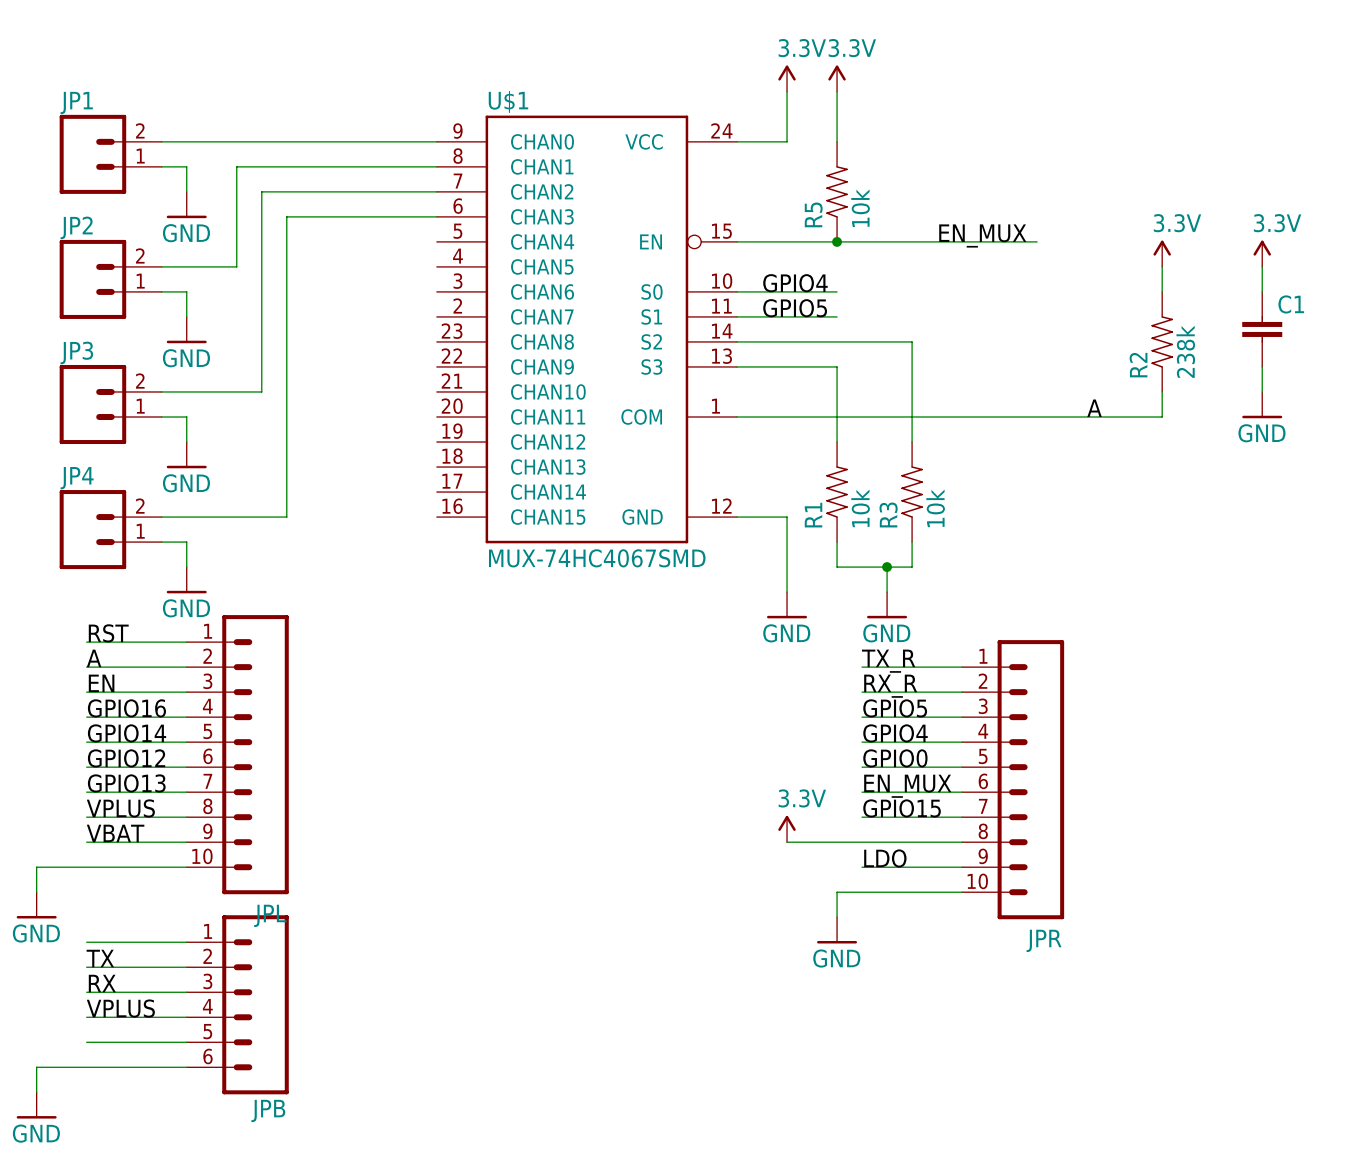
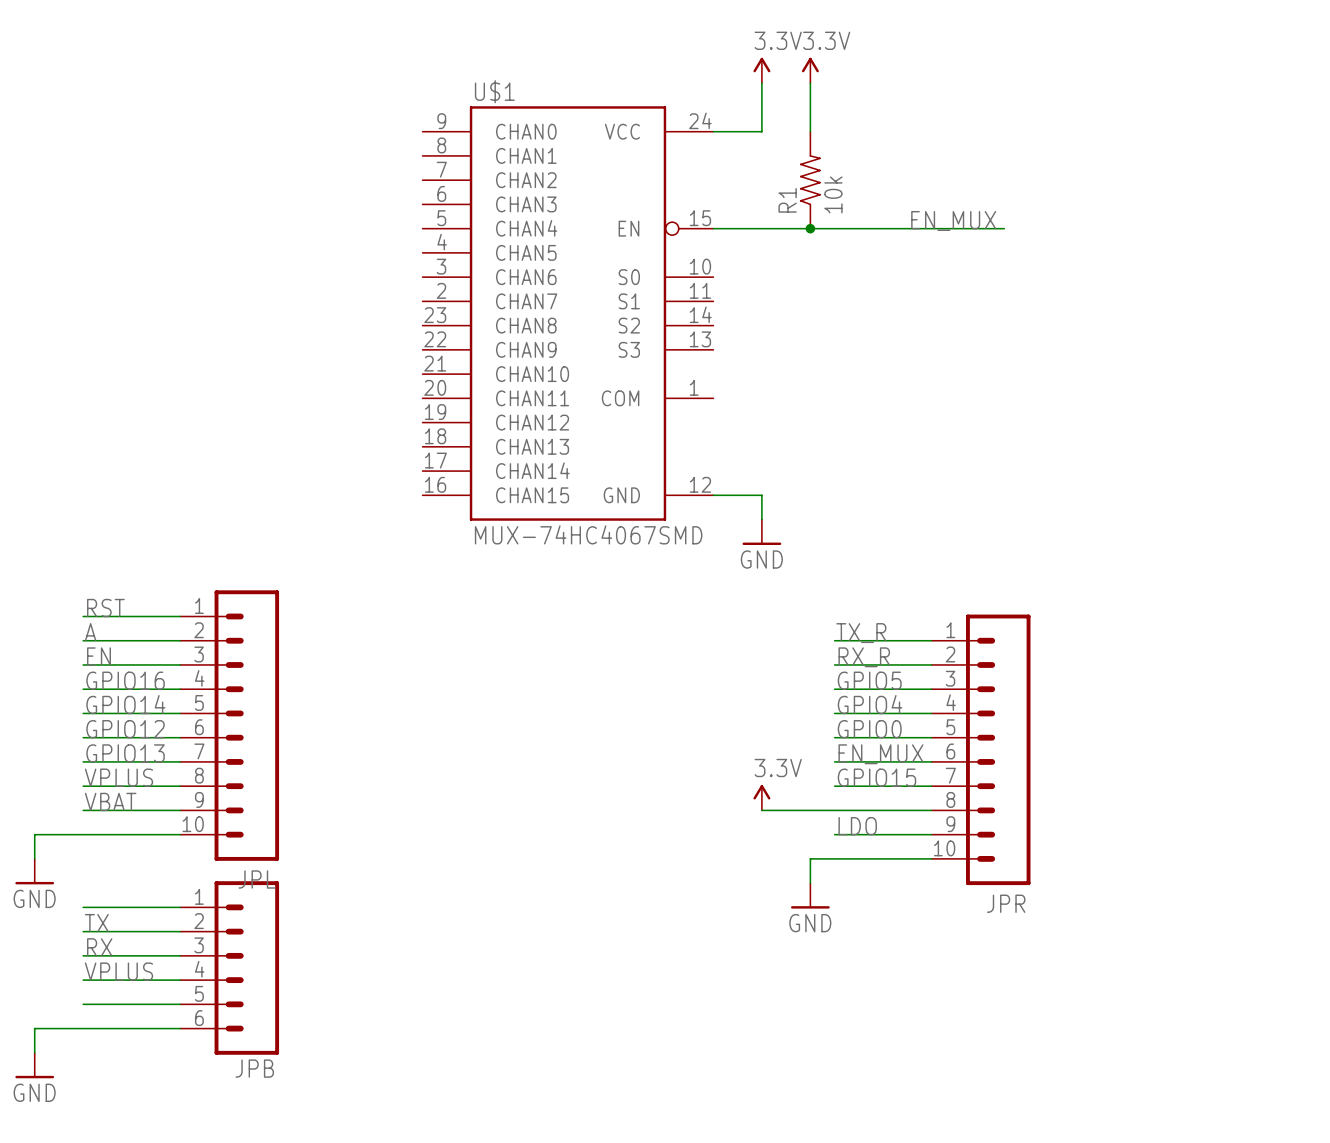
wire: (161, 141) (436, 141) -> none
JP1: (110, 154) -> none
wire: (161, 166) (186, 166) (186, 191) -> none
wire: (436, 166) (236, 166) (236, 266) (161, 266) -> none
wire: (436, 191) (261, 191) (261, 391) (161, 391) -> none
power symbol: GND (186, 205) -> none
R5 name: R5 (813, 214) -> R1 (787, 200)
wire: (436, 216) (286, 216) (286, 517) (161, 517) -> none
power symbol: 3.3V (1162, 253) -> none
power symbol: 3.3V (1262, 253) -> none
wire: (1162, 266) (1162, 291) -> none
wire: (1262, 266) (1262, 291) -> none
JP2: (110, 279) -> none
label: GPIO4 (795, 283) -> none
wire: (161, 291) (186, 291) (186, 316) -> none
wire: (736, 291) (837, 291) -> none
label: GPIO5 (795, 308) -> none
wire: (736, 316) (837, 316) -> none
C1: (1262, 329) -> none
power symbol: GND (186, 330) -> none
wire: (736, 341) (912, 341) (912, 442) -> none
R2: 238k (1162, 341) -> none
wire: (736, 366) (837, 366) (837, 442) -> none
wire: (1262, 366) (1262, 391) -> none
wire: (1162, 391) (1162, 417) (736, 417) -> none
JP3: (110, 404) -> none
power symbol: GND (1262, 405) -> none
label: A (1094, 408) -> none
wire: (161, 417) (186, 417) (186, 442) -> none
power symbol: GND (186, 455) -> none
R1: 10k (837, 492) -> none
R3: 10k (912, 492) -> none
JP4: (110, 529) -> none
wire: (161, 542) (186, 542) (186, 567) -> none
wire: (837, 542) (837, 567) (912, 567) (912, 542) -> none
wire: (887, 567) (887, 592) -> none
junction: (887, 567) -> none
power symbol: GND (186, 580) -> none
power symbol position: GND (787, 605) -> GND (761, 532)
power symbol: GND (887, 605) -> none

